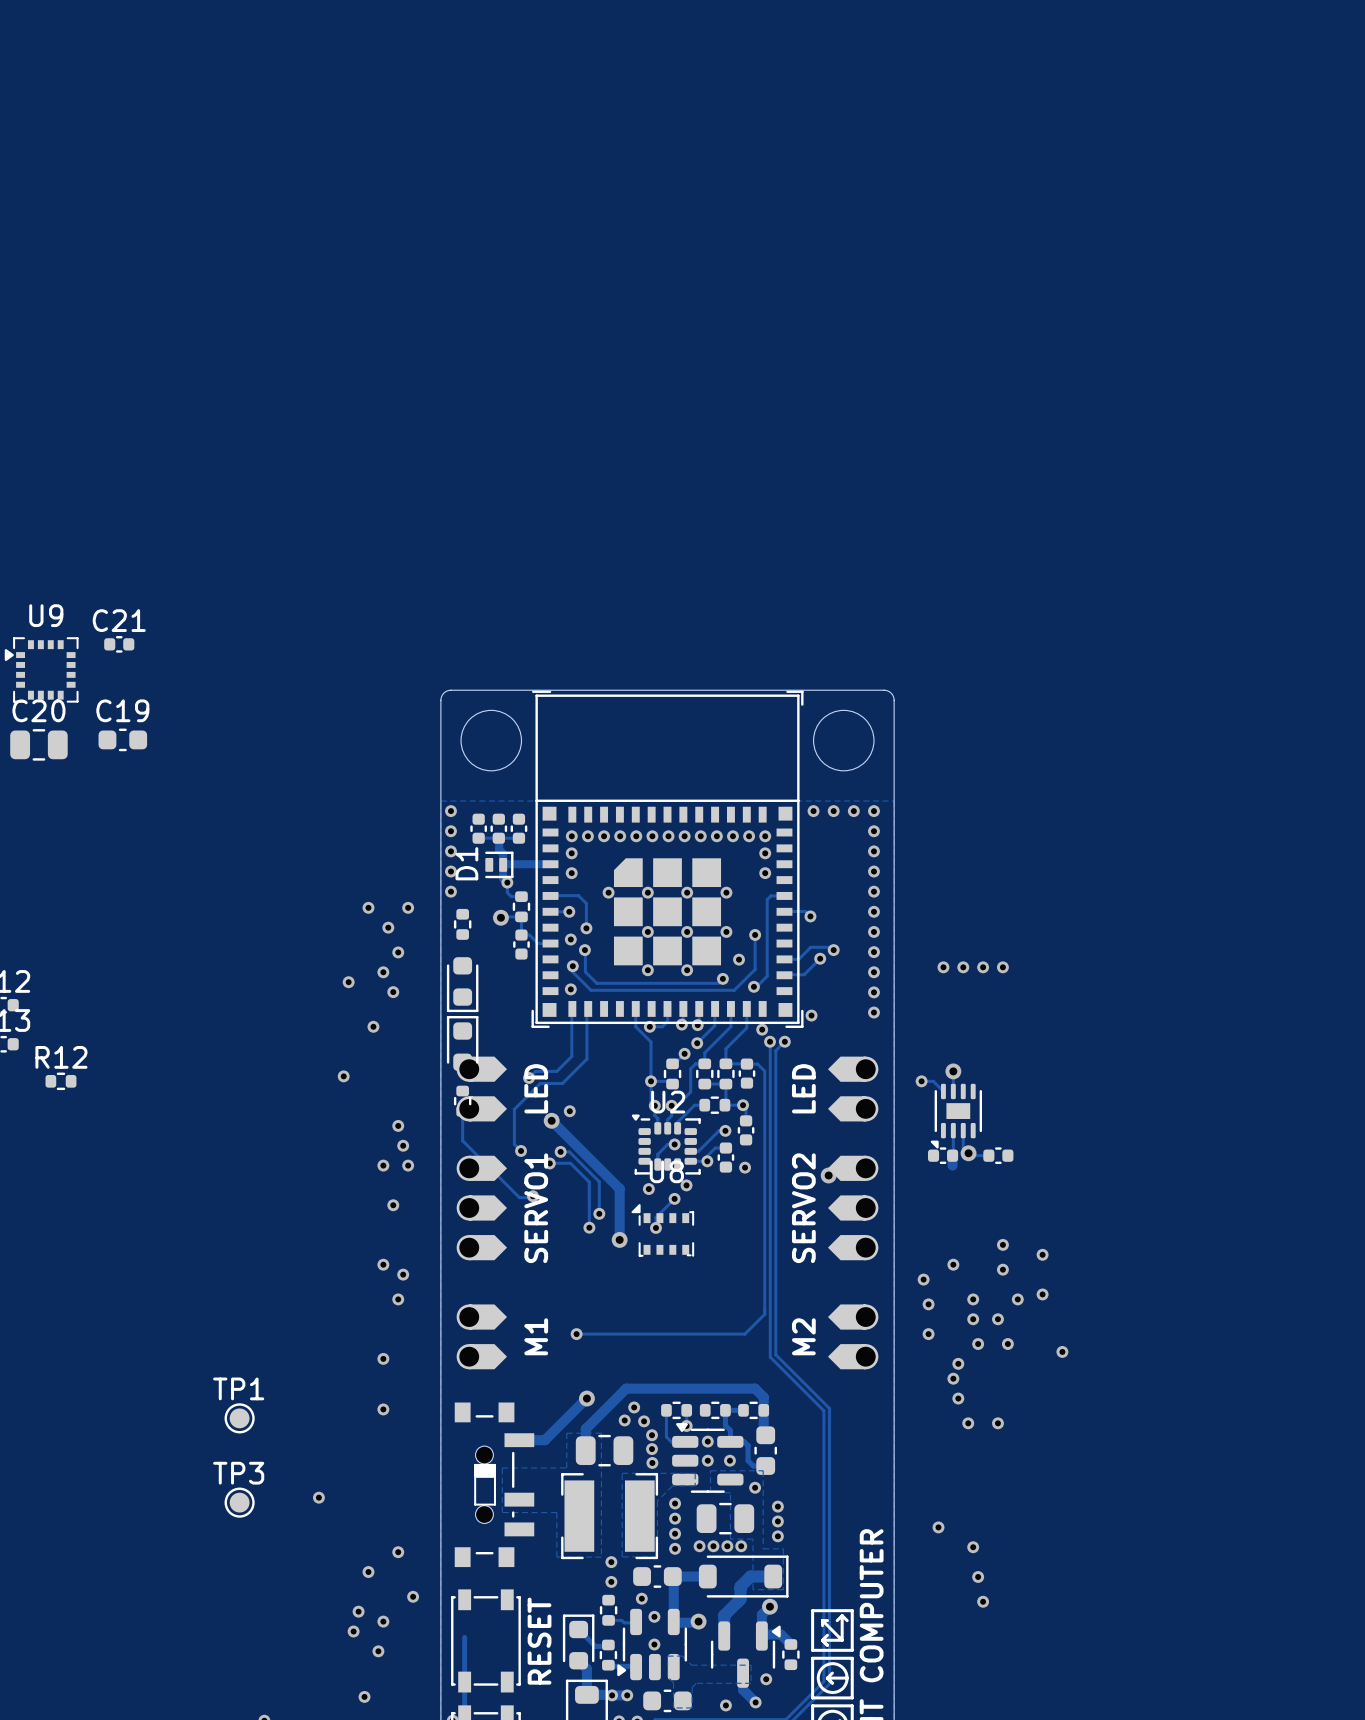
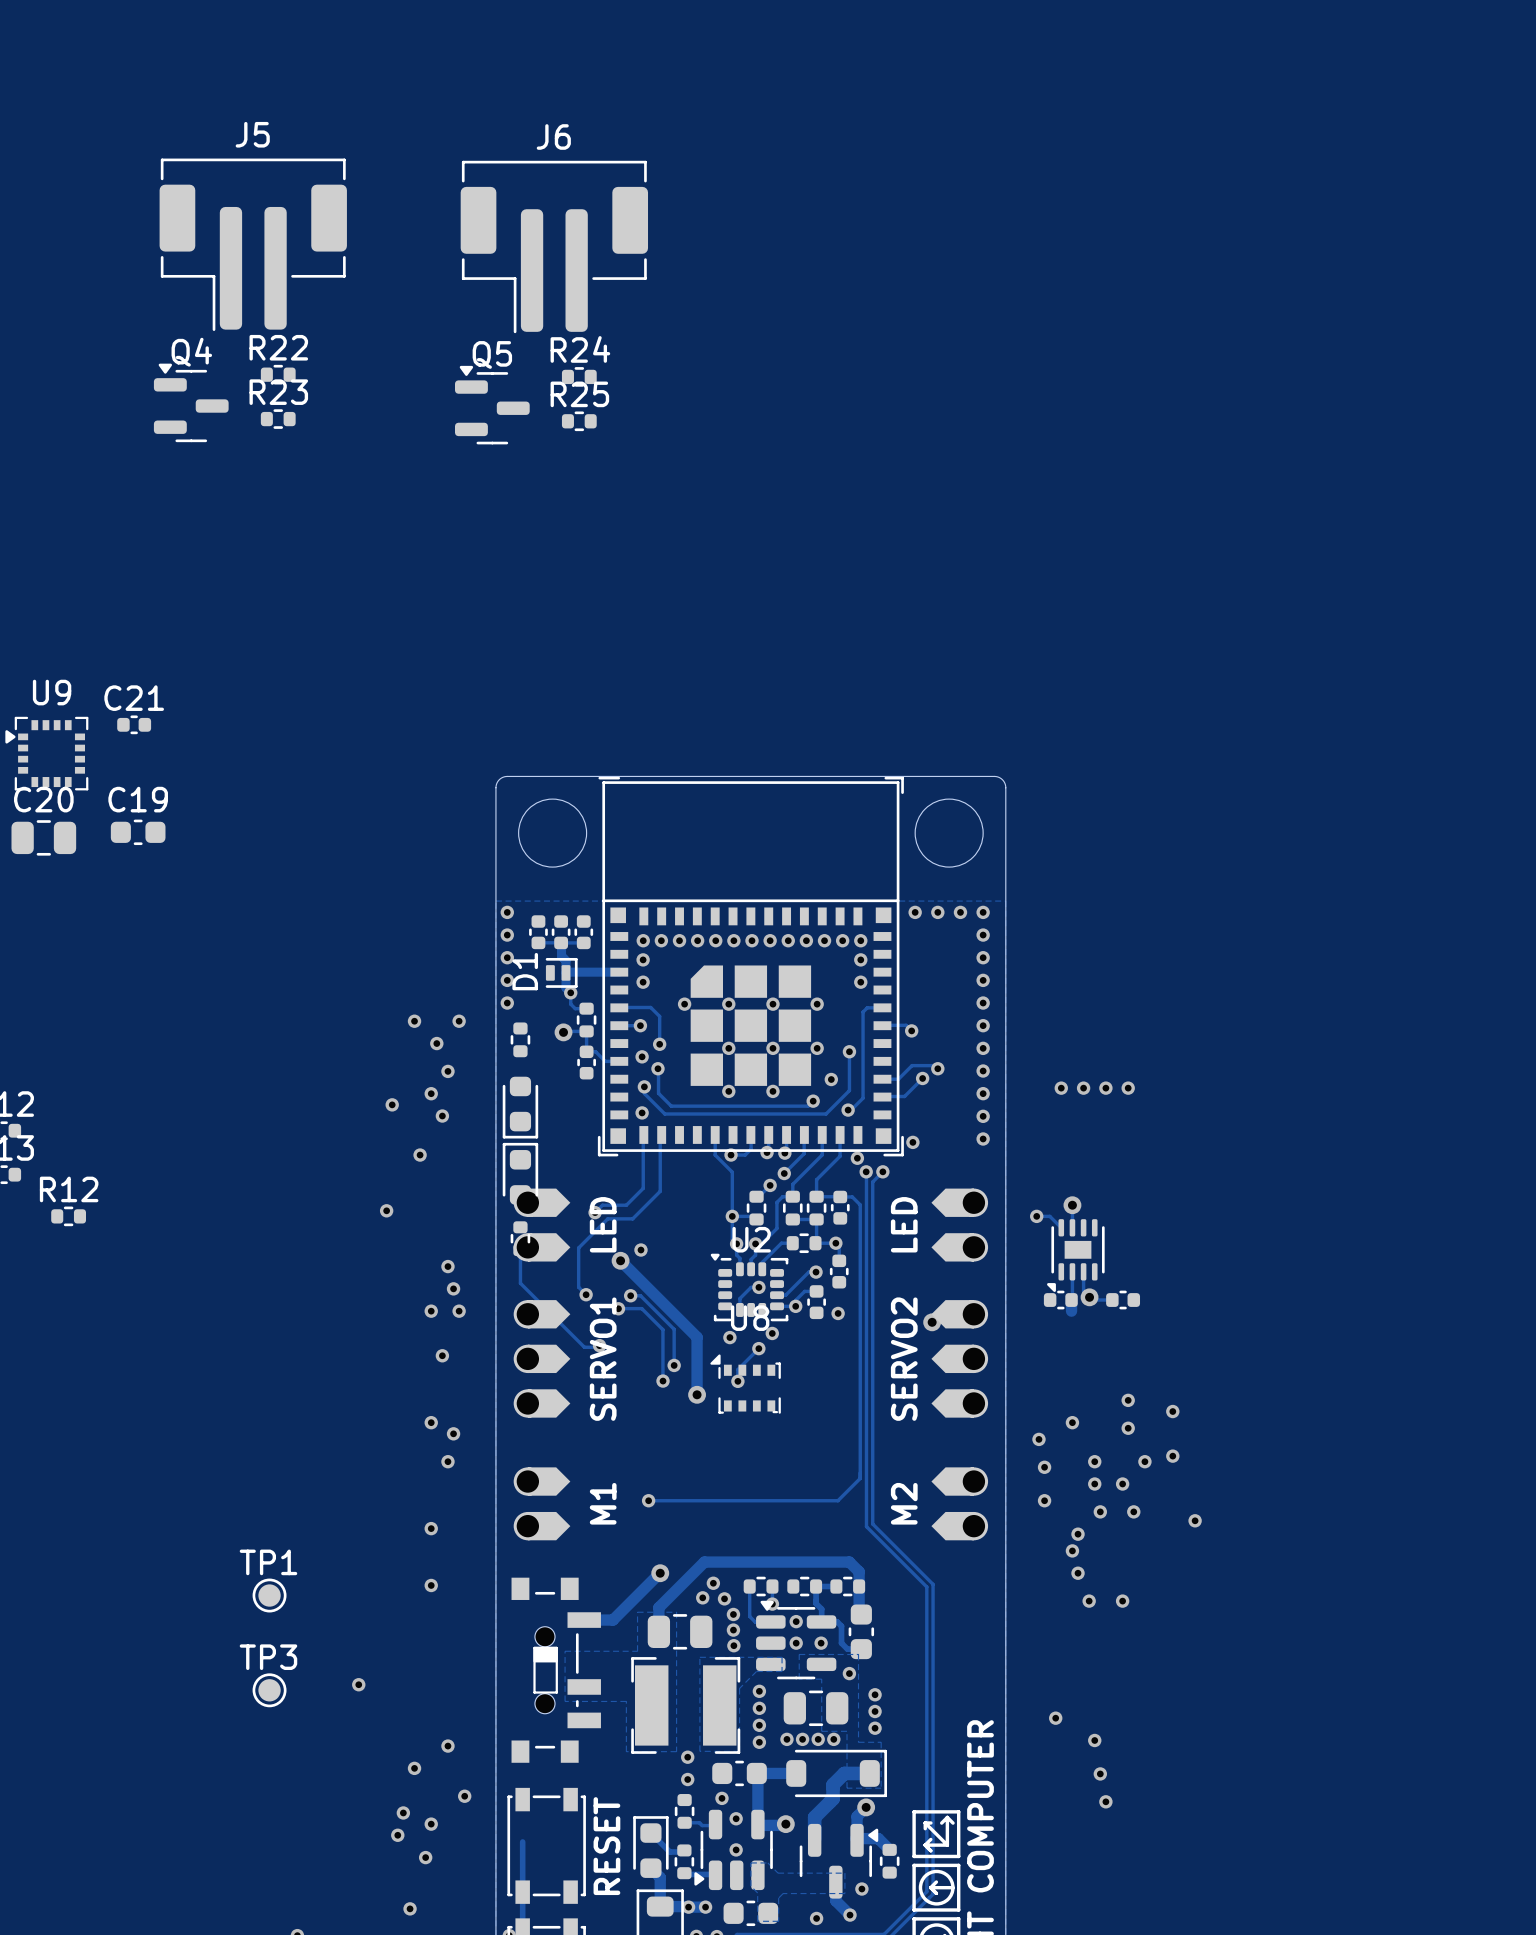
J5: none -> (253, 244)
J6: none -> (554, 247)
R22: none -> (278, 374)
R24: none -> (579, 376)
Q4: none -> (191, 402)
Q5: none -> (492, 405)
R23: none -> (278, 419)
R25: none -> (579, 421)

